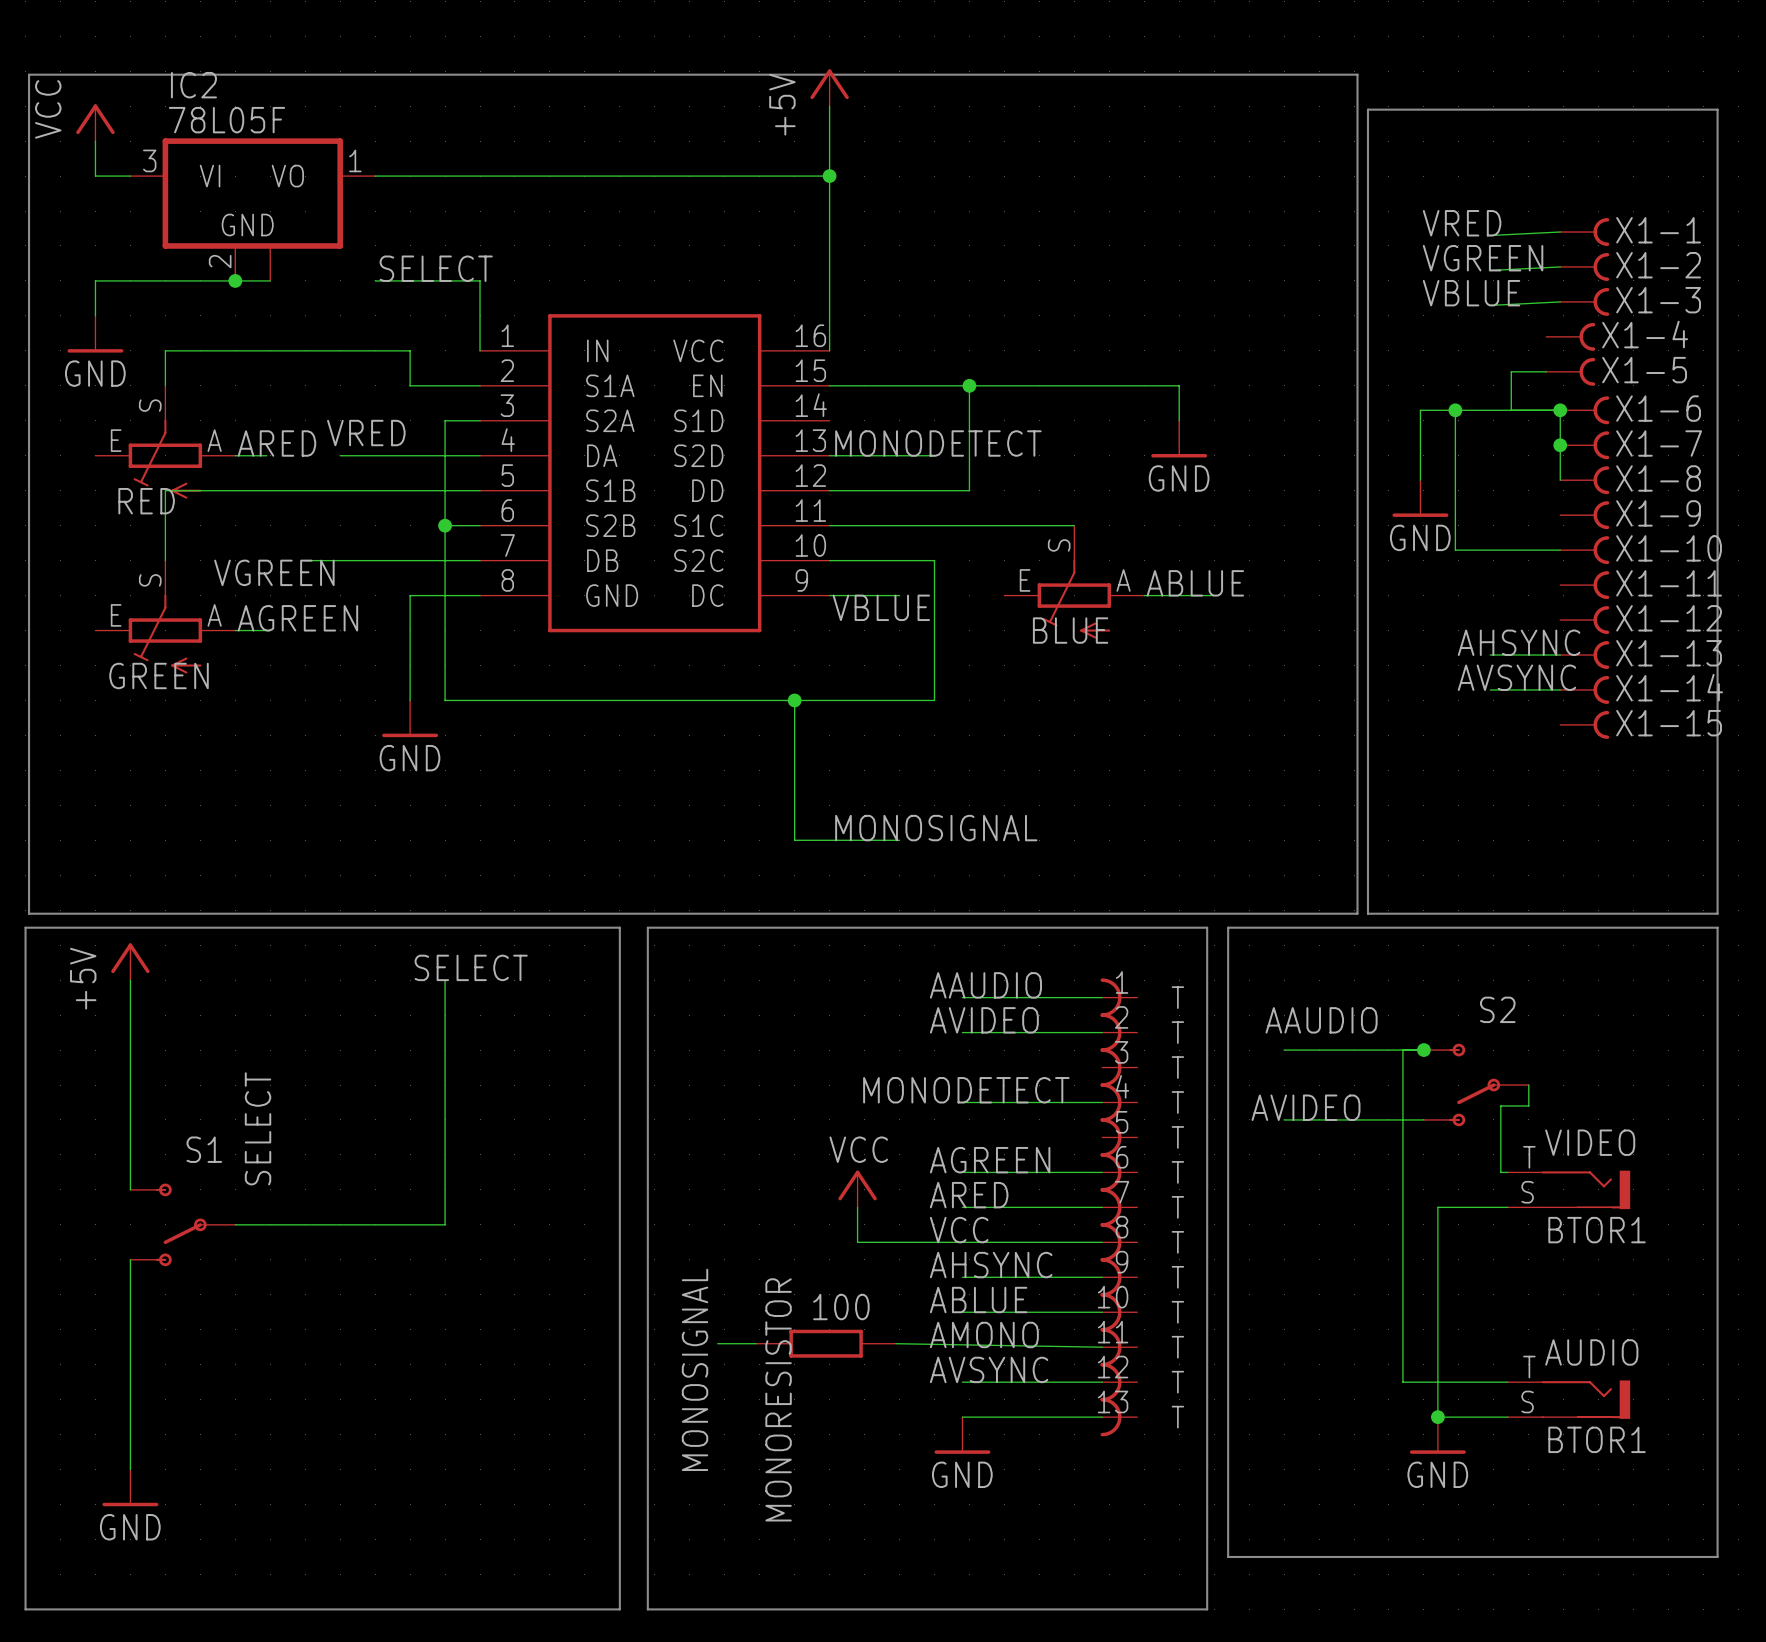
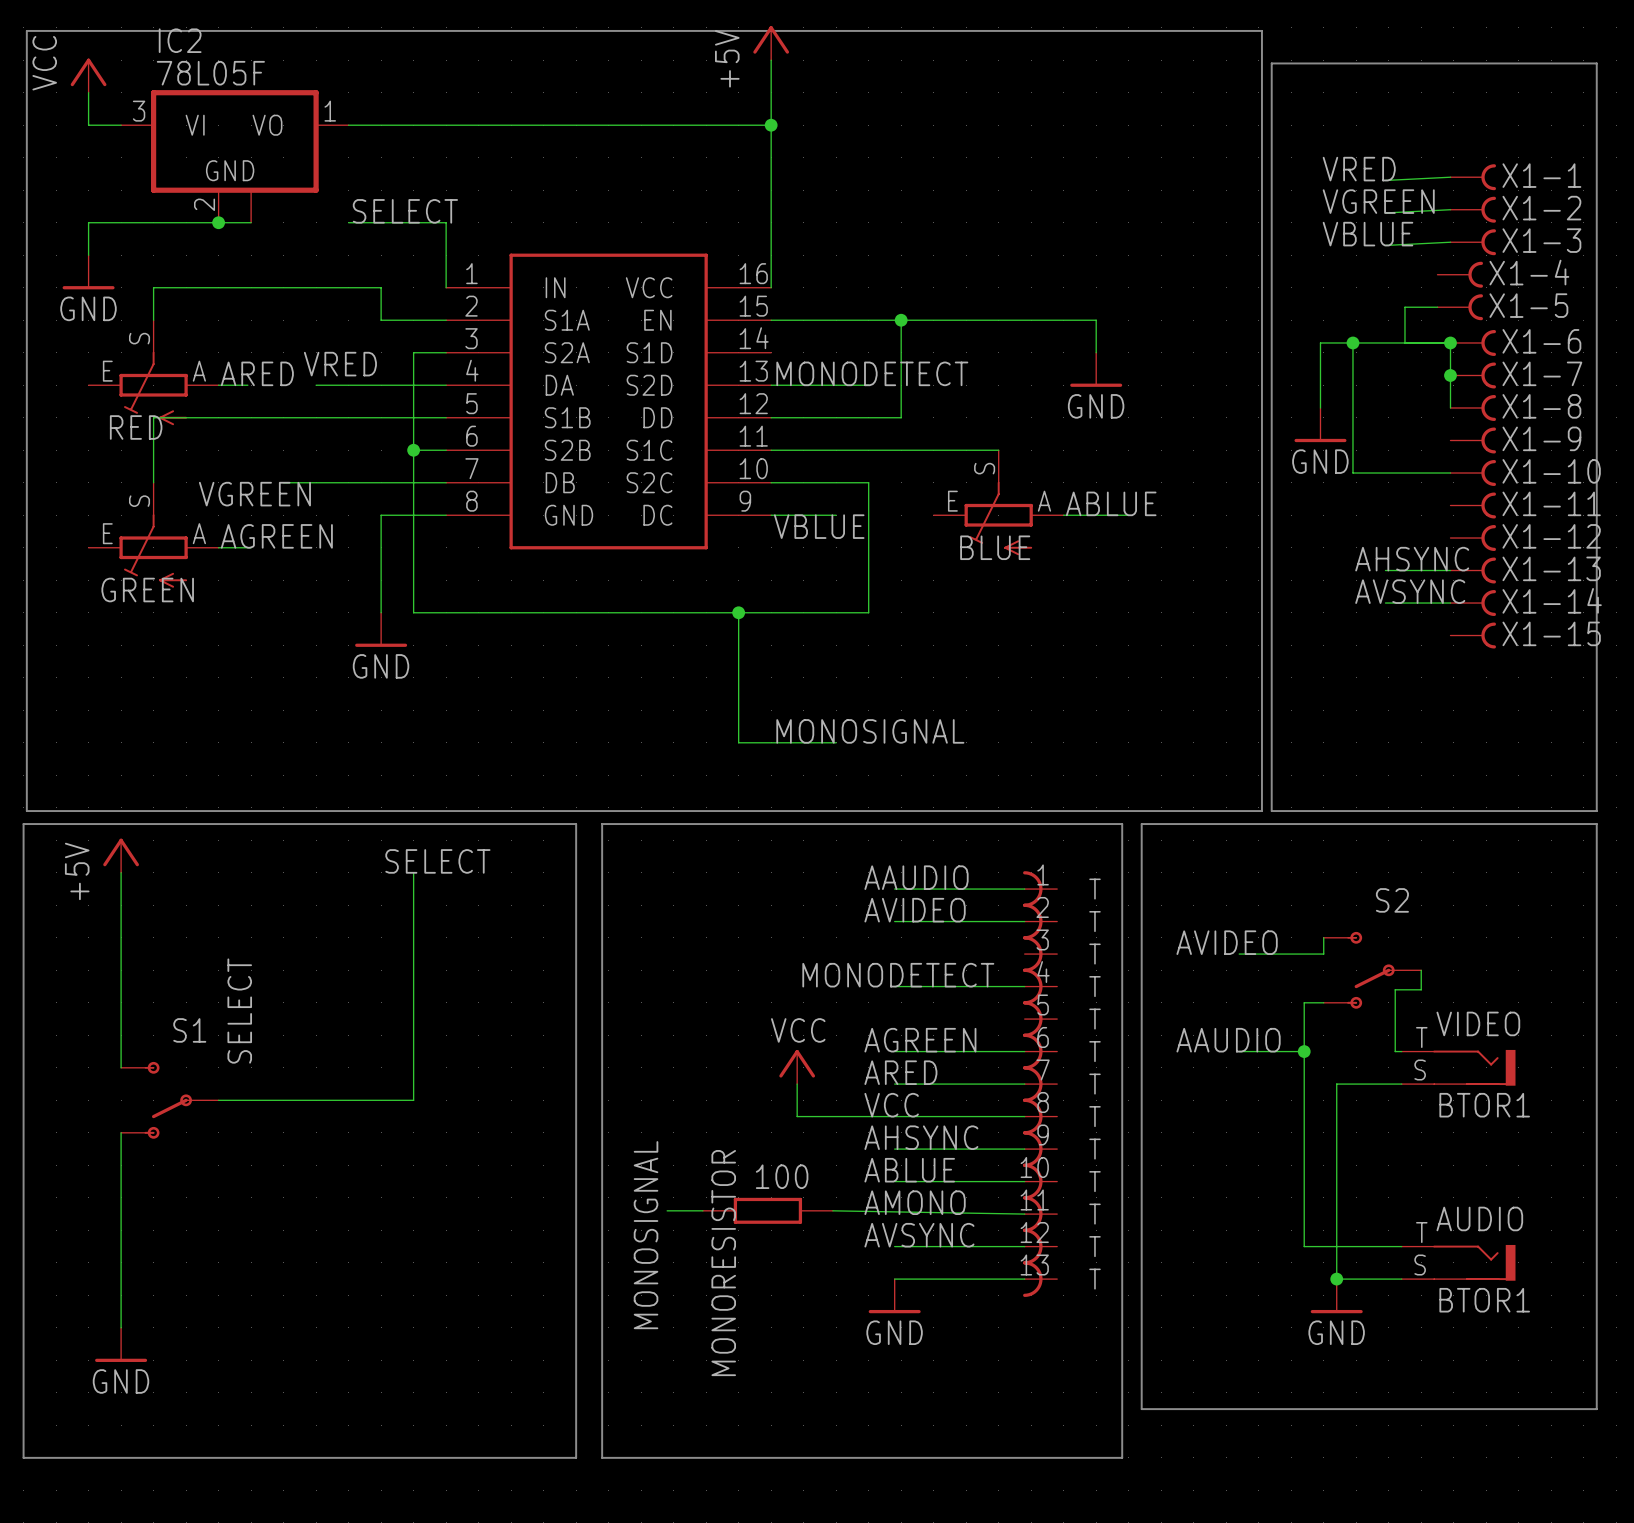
label position: AAUDIO (1321, 1020) -> AAUDIO (1228, 1040)
wire: (1284, 1050) (1423, 1050) -> (1239, 954) (1323, 954) (1323, 937)
wire: (1402, 1050) (1402, 1119) (1284, 1119) -> none
junction: (1423, 1050) -> none
label position: AVIDEO (1305, 1107) -> AVIDEO (1227, 942)
wire: none -> (1239, 1051) (1304, 1051)
junction: none -> (1304, 1051)

